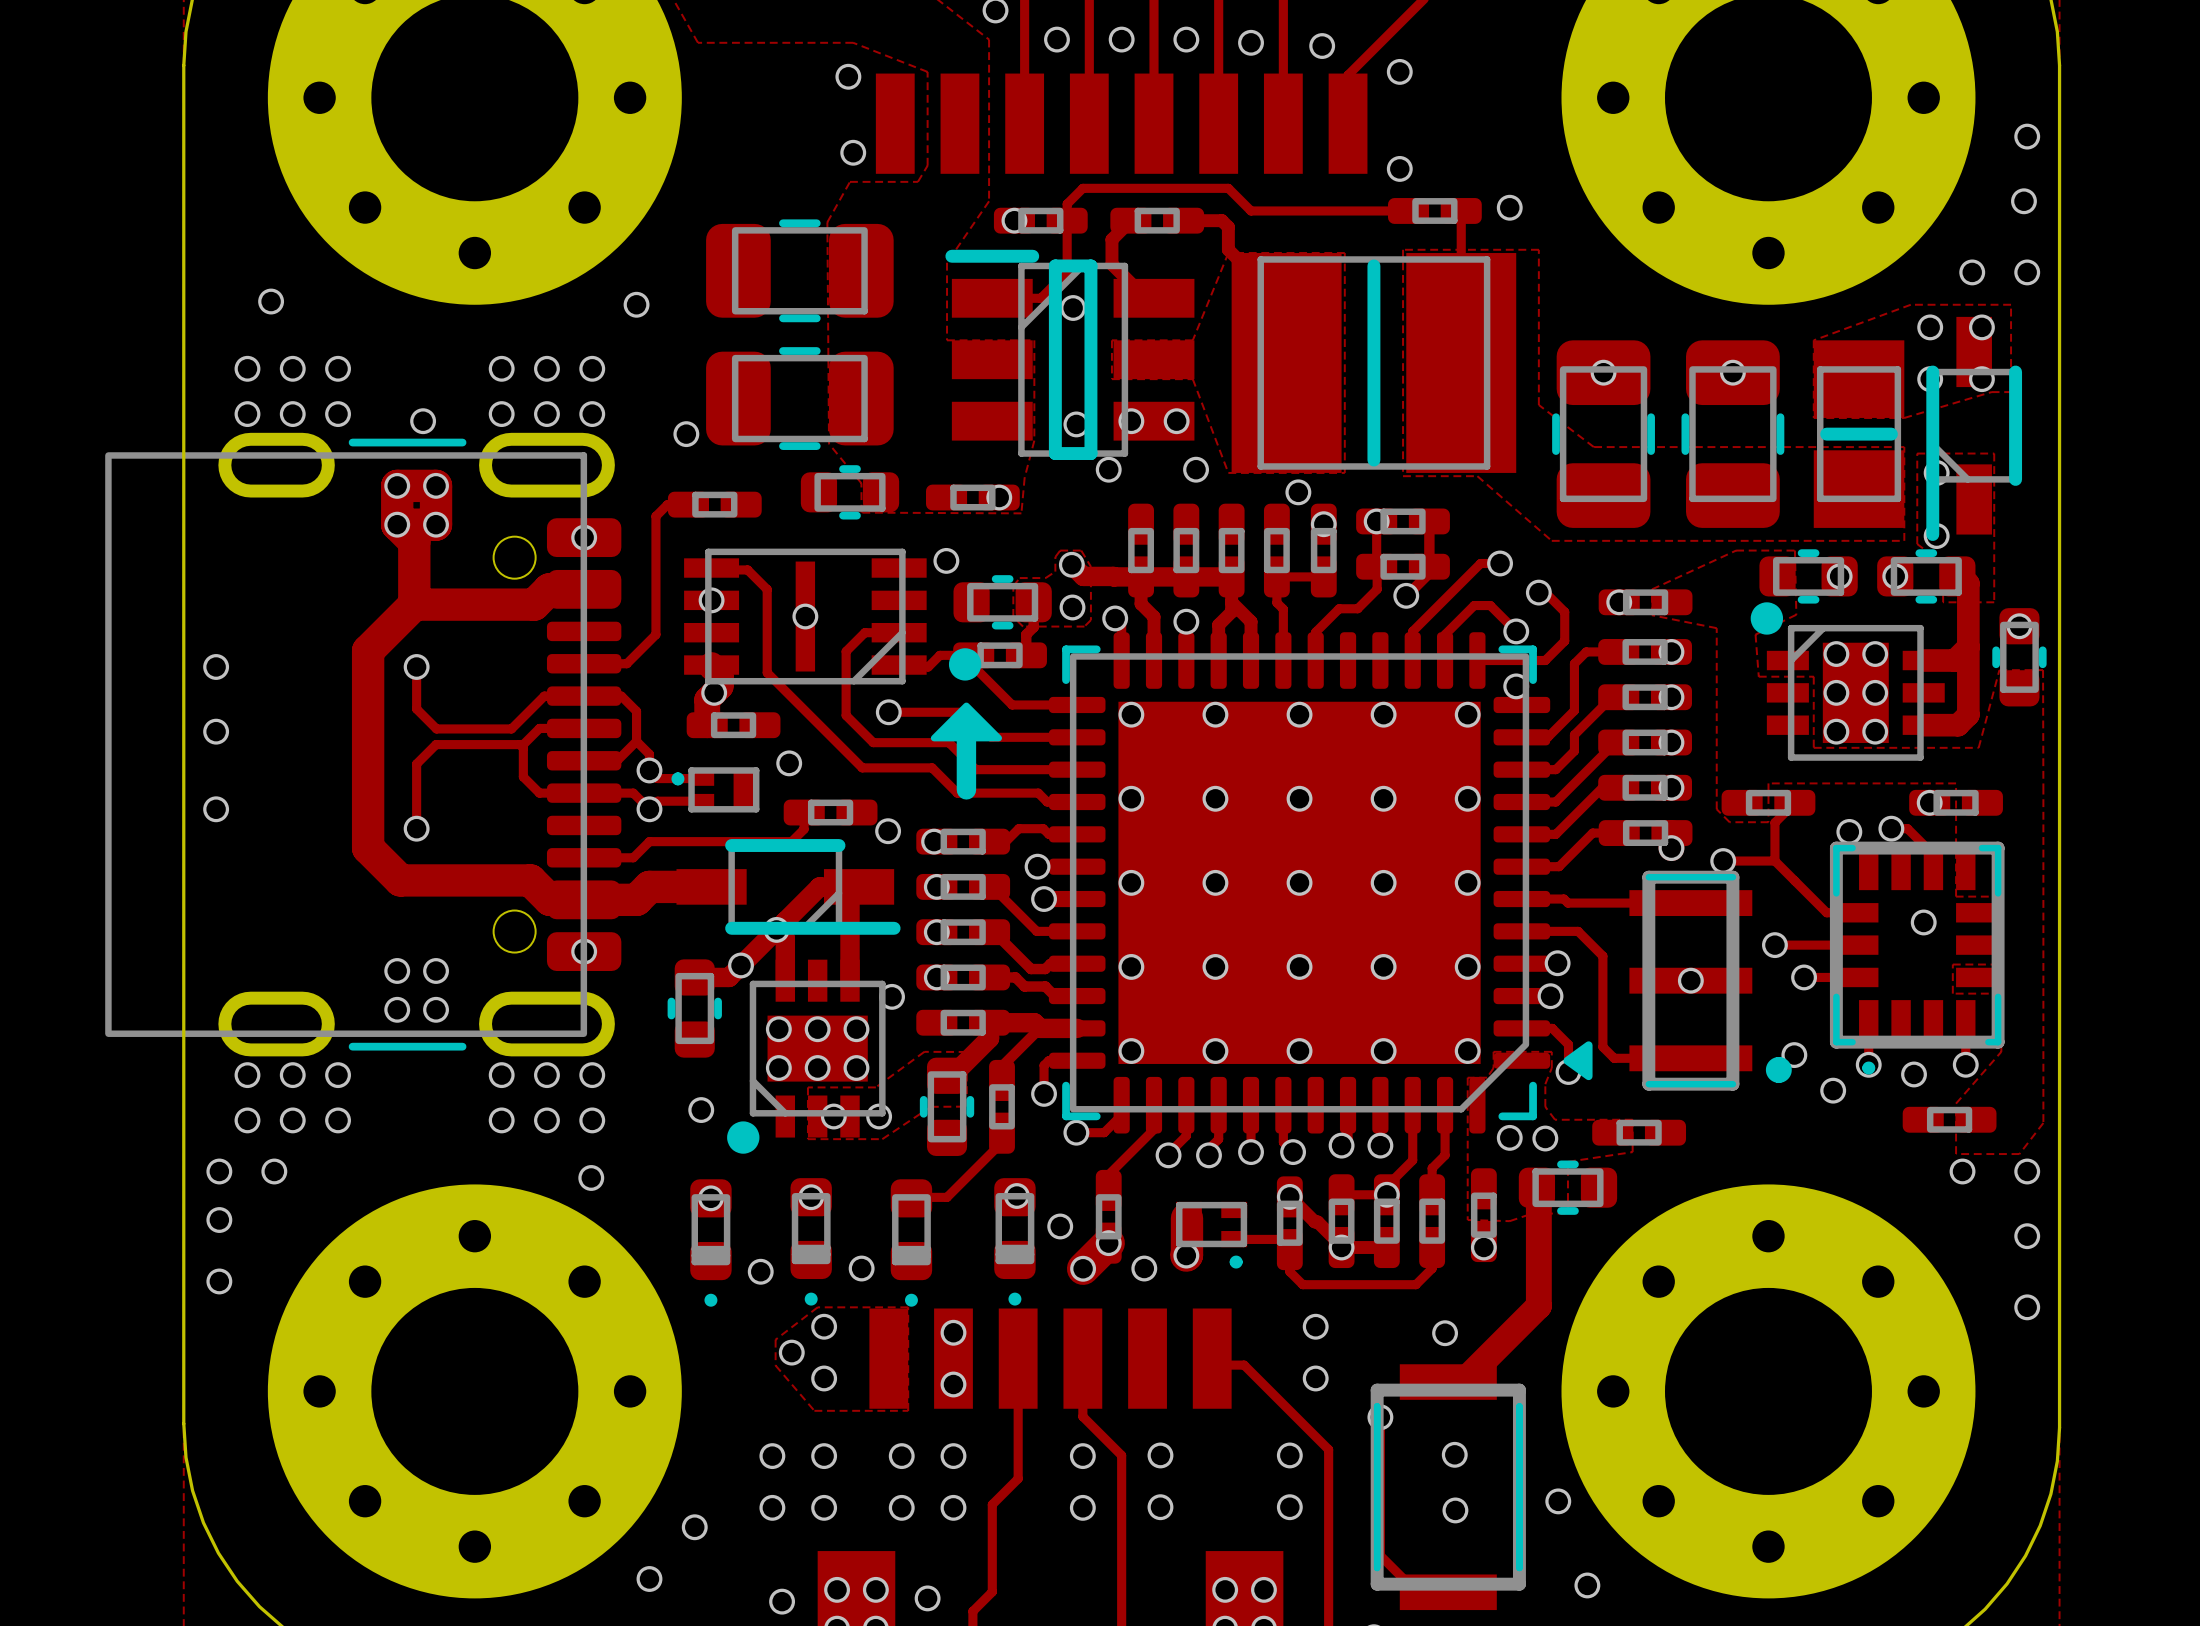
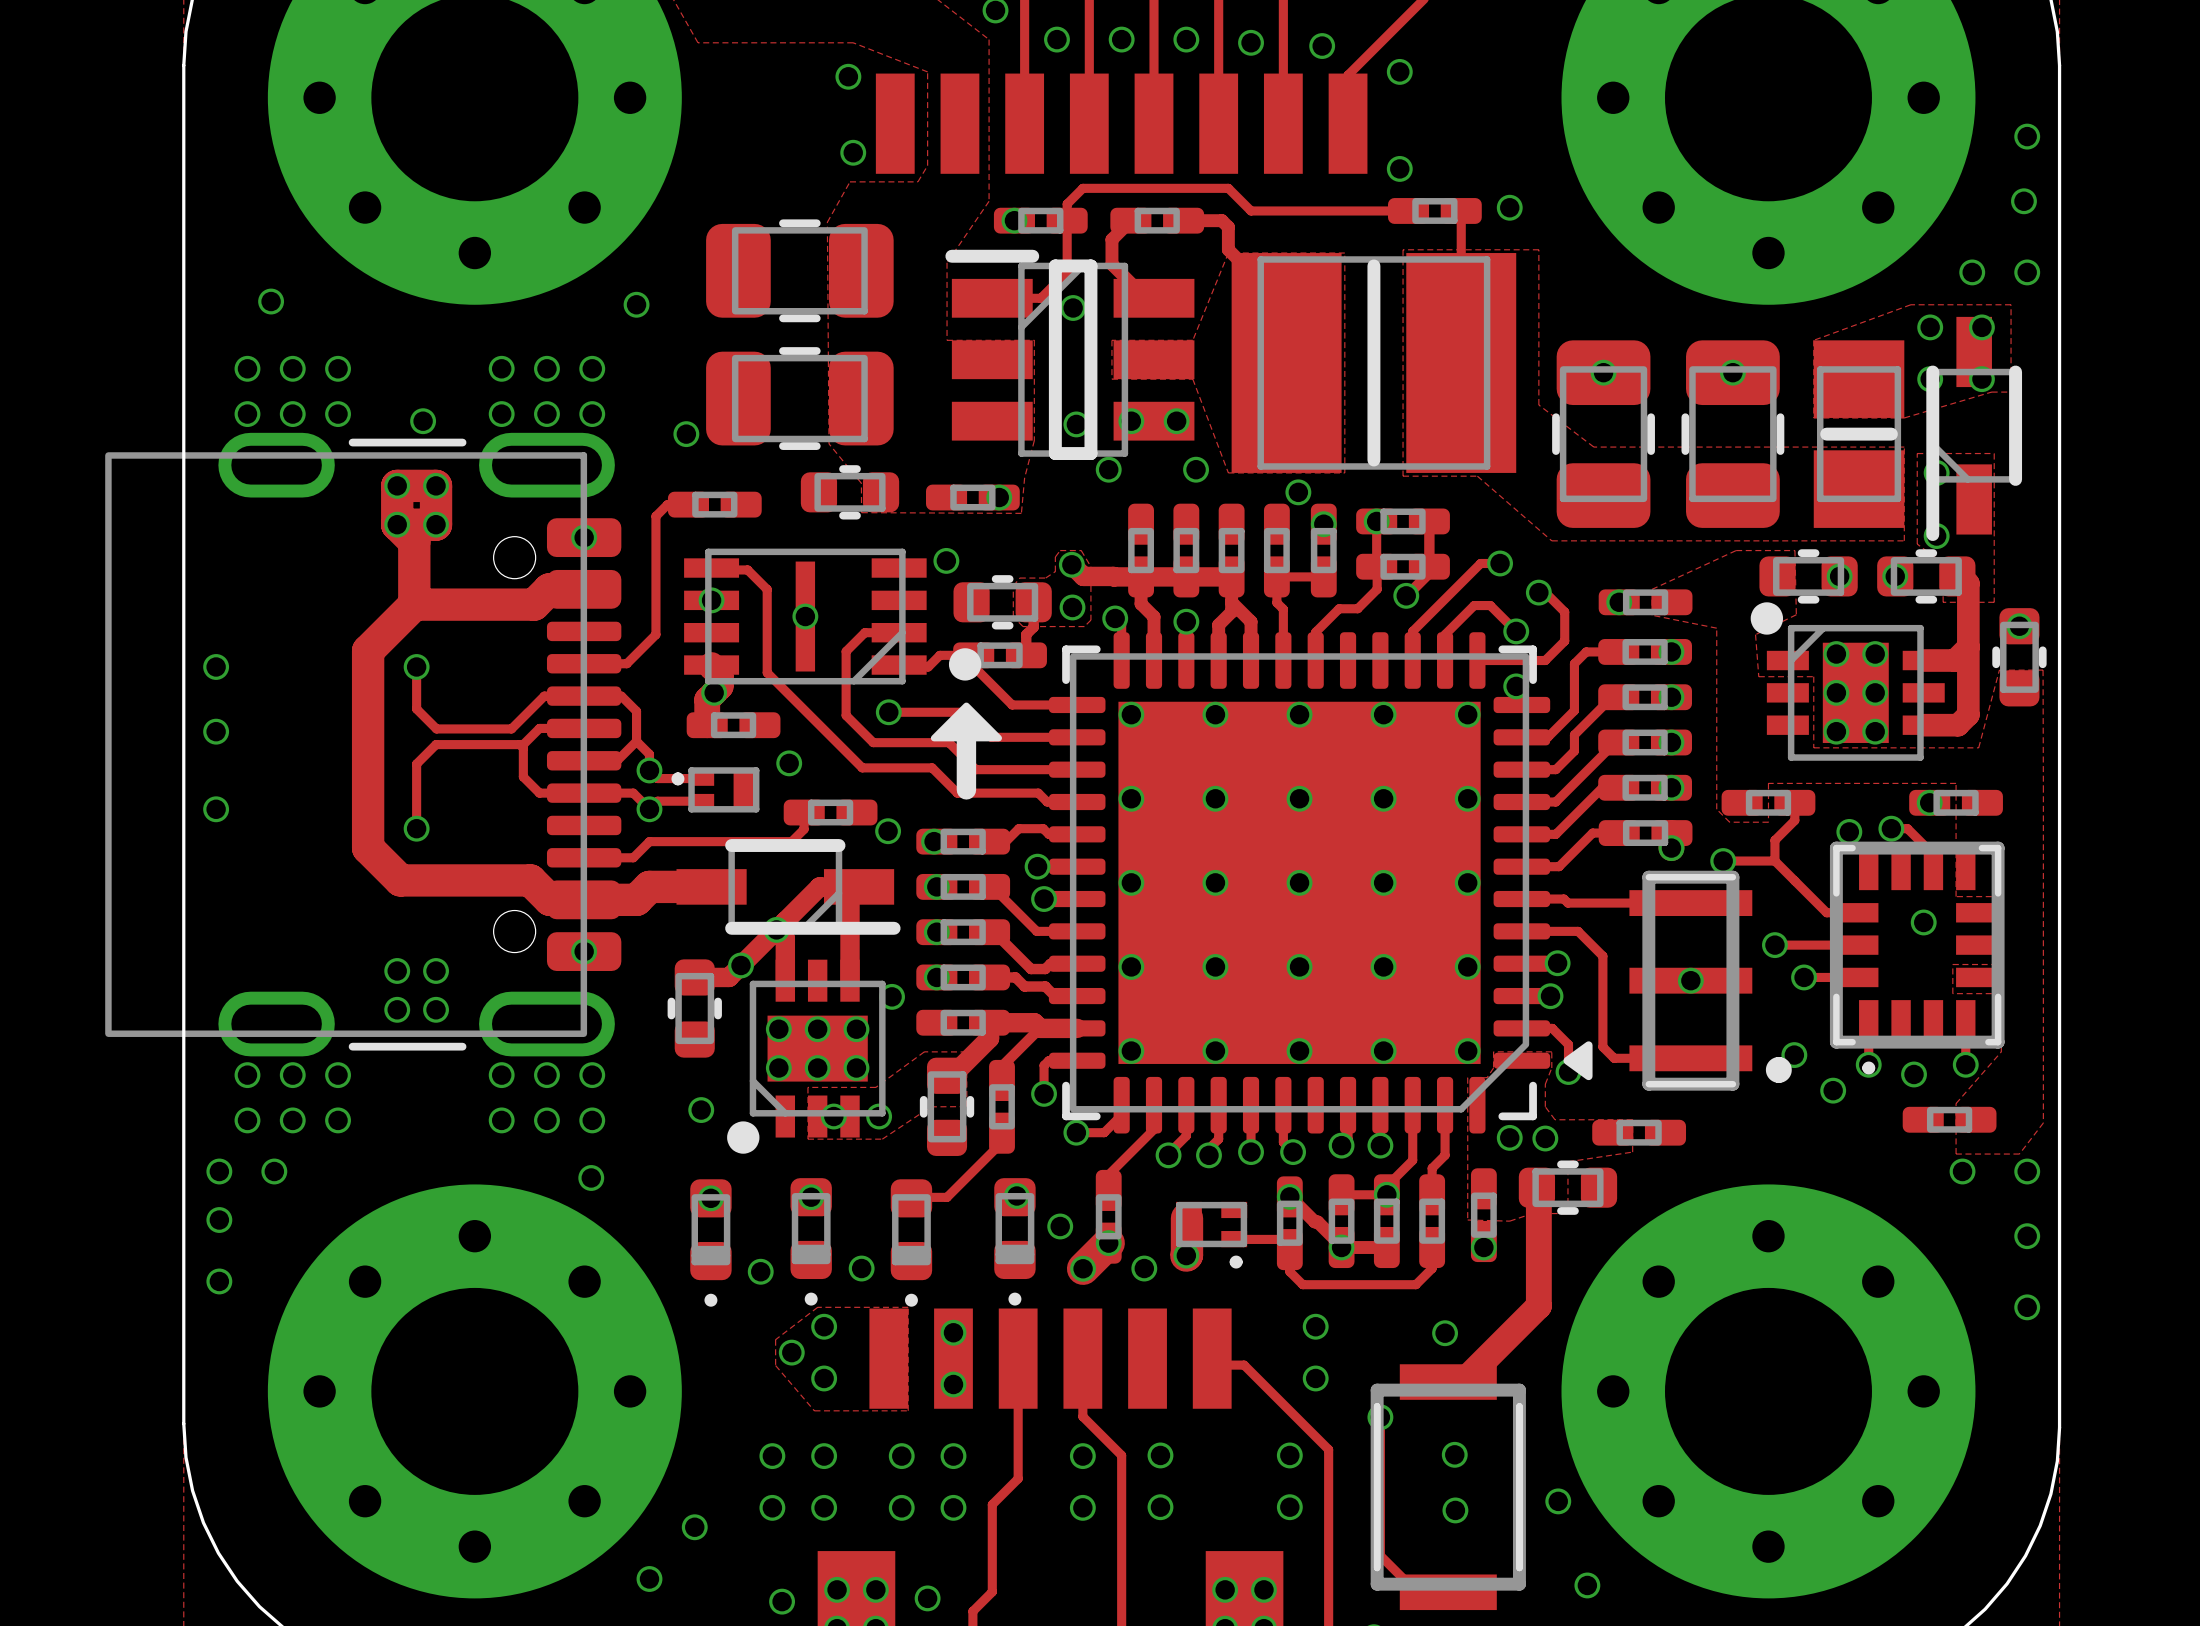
track: (1794, 802) (1774, 822) (1774, 840) -> (1794, 802) (1794, 820) (1774, 840)

